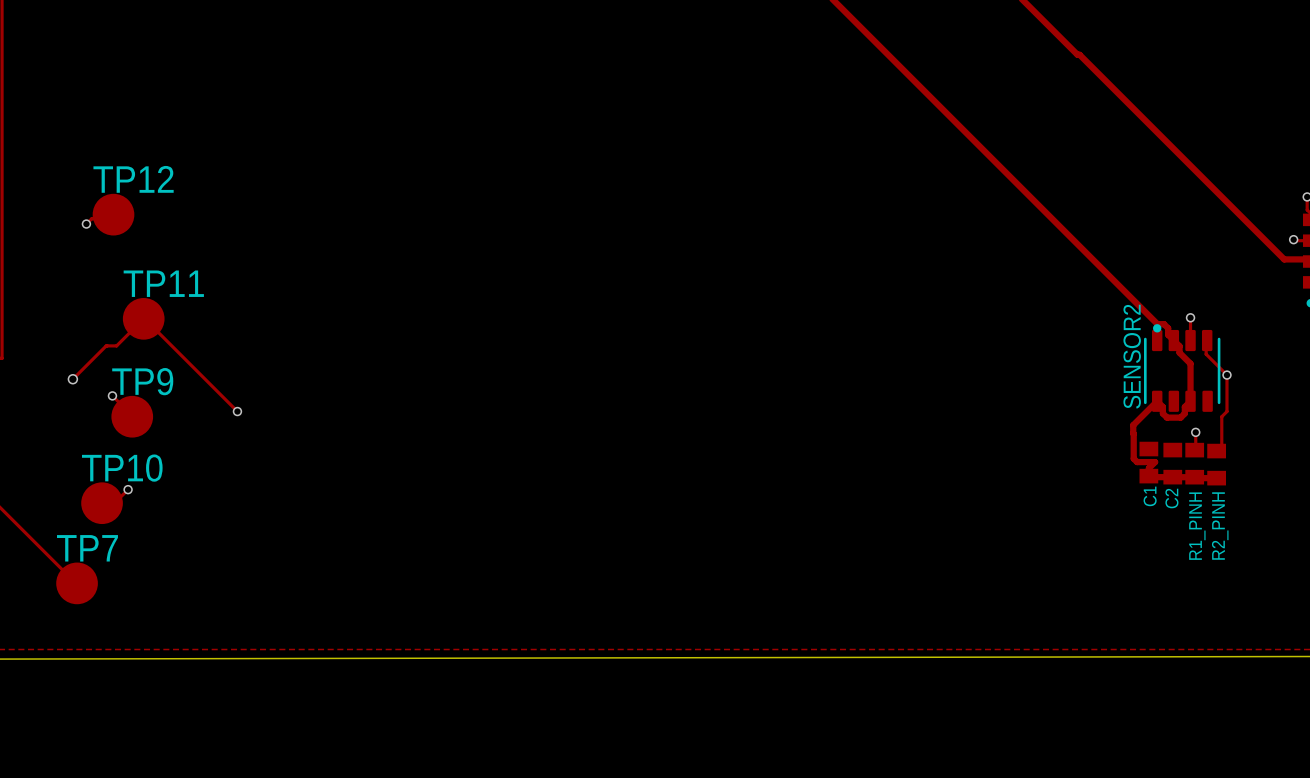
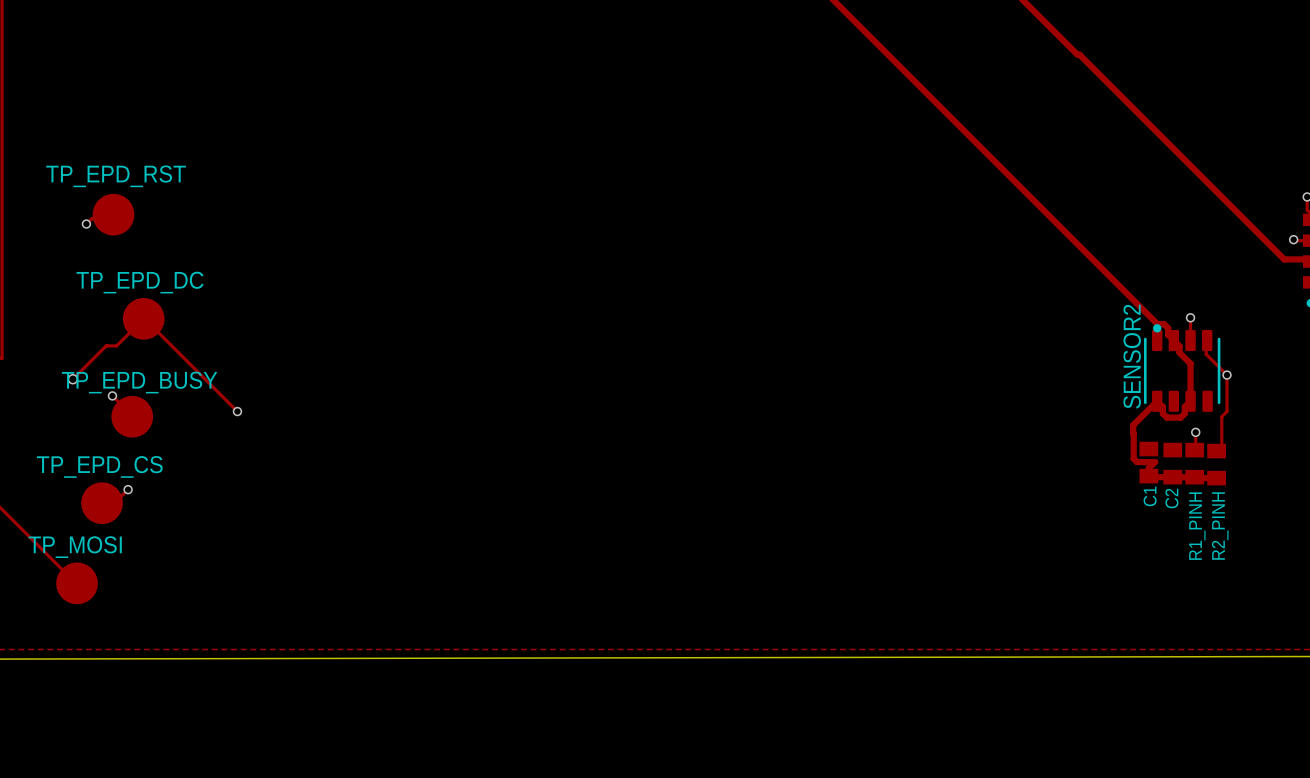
TP12 name: TP12 (133, 179) -> TP_EPD_RST (116, 176)
TP11 name: TP11 (163, 283) -> TP_EPD_DC (140, 282)
TP9 name: TP9 (142, 381) -> TP_EPD_BUSY (139, 382)
TP10 name: TP10 (122, 468) -> TP_EPD_CS (99, 466)
TP7 name: TP7 (87, 548) -> TP_MOSI (75, 547)

